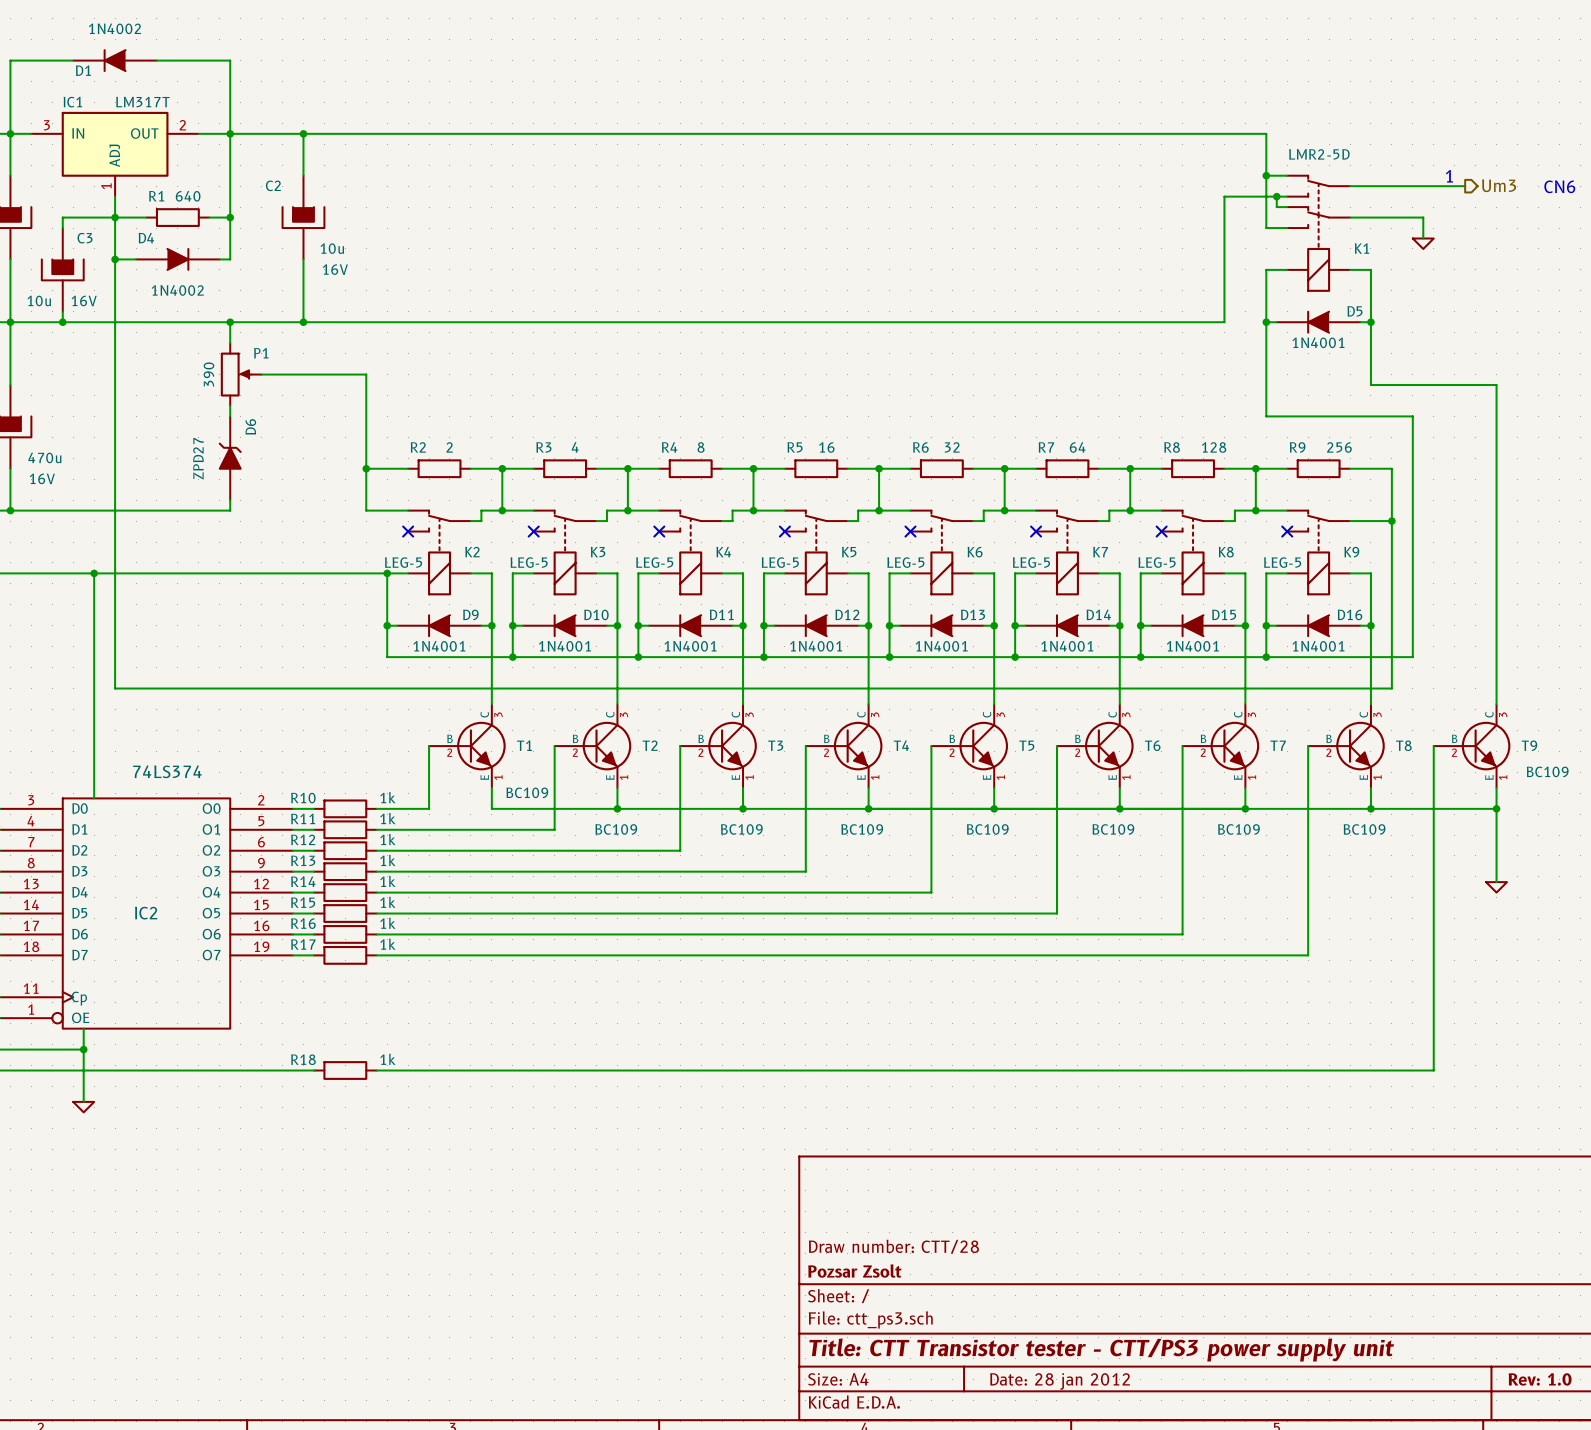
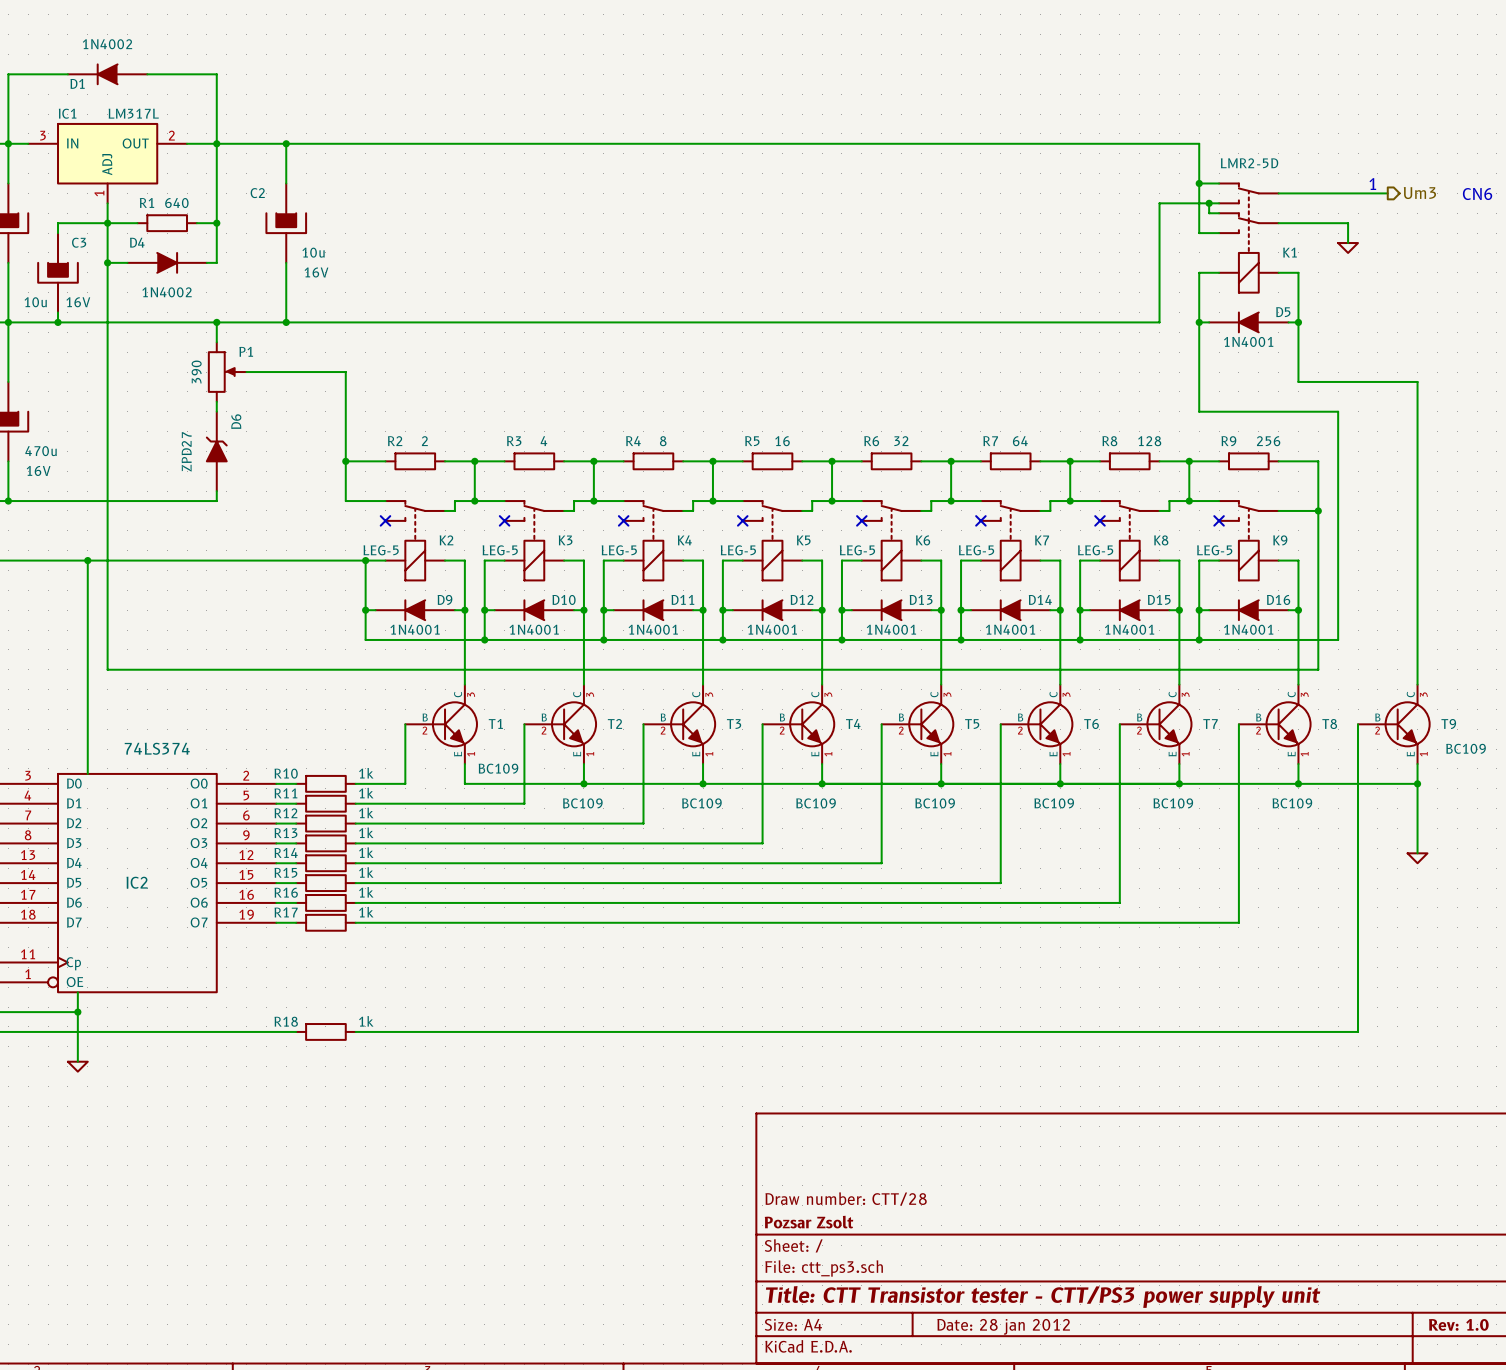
IC1 value: LM317T (142, 102) -> LM317L (133, 113)

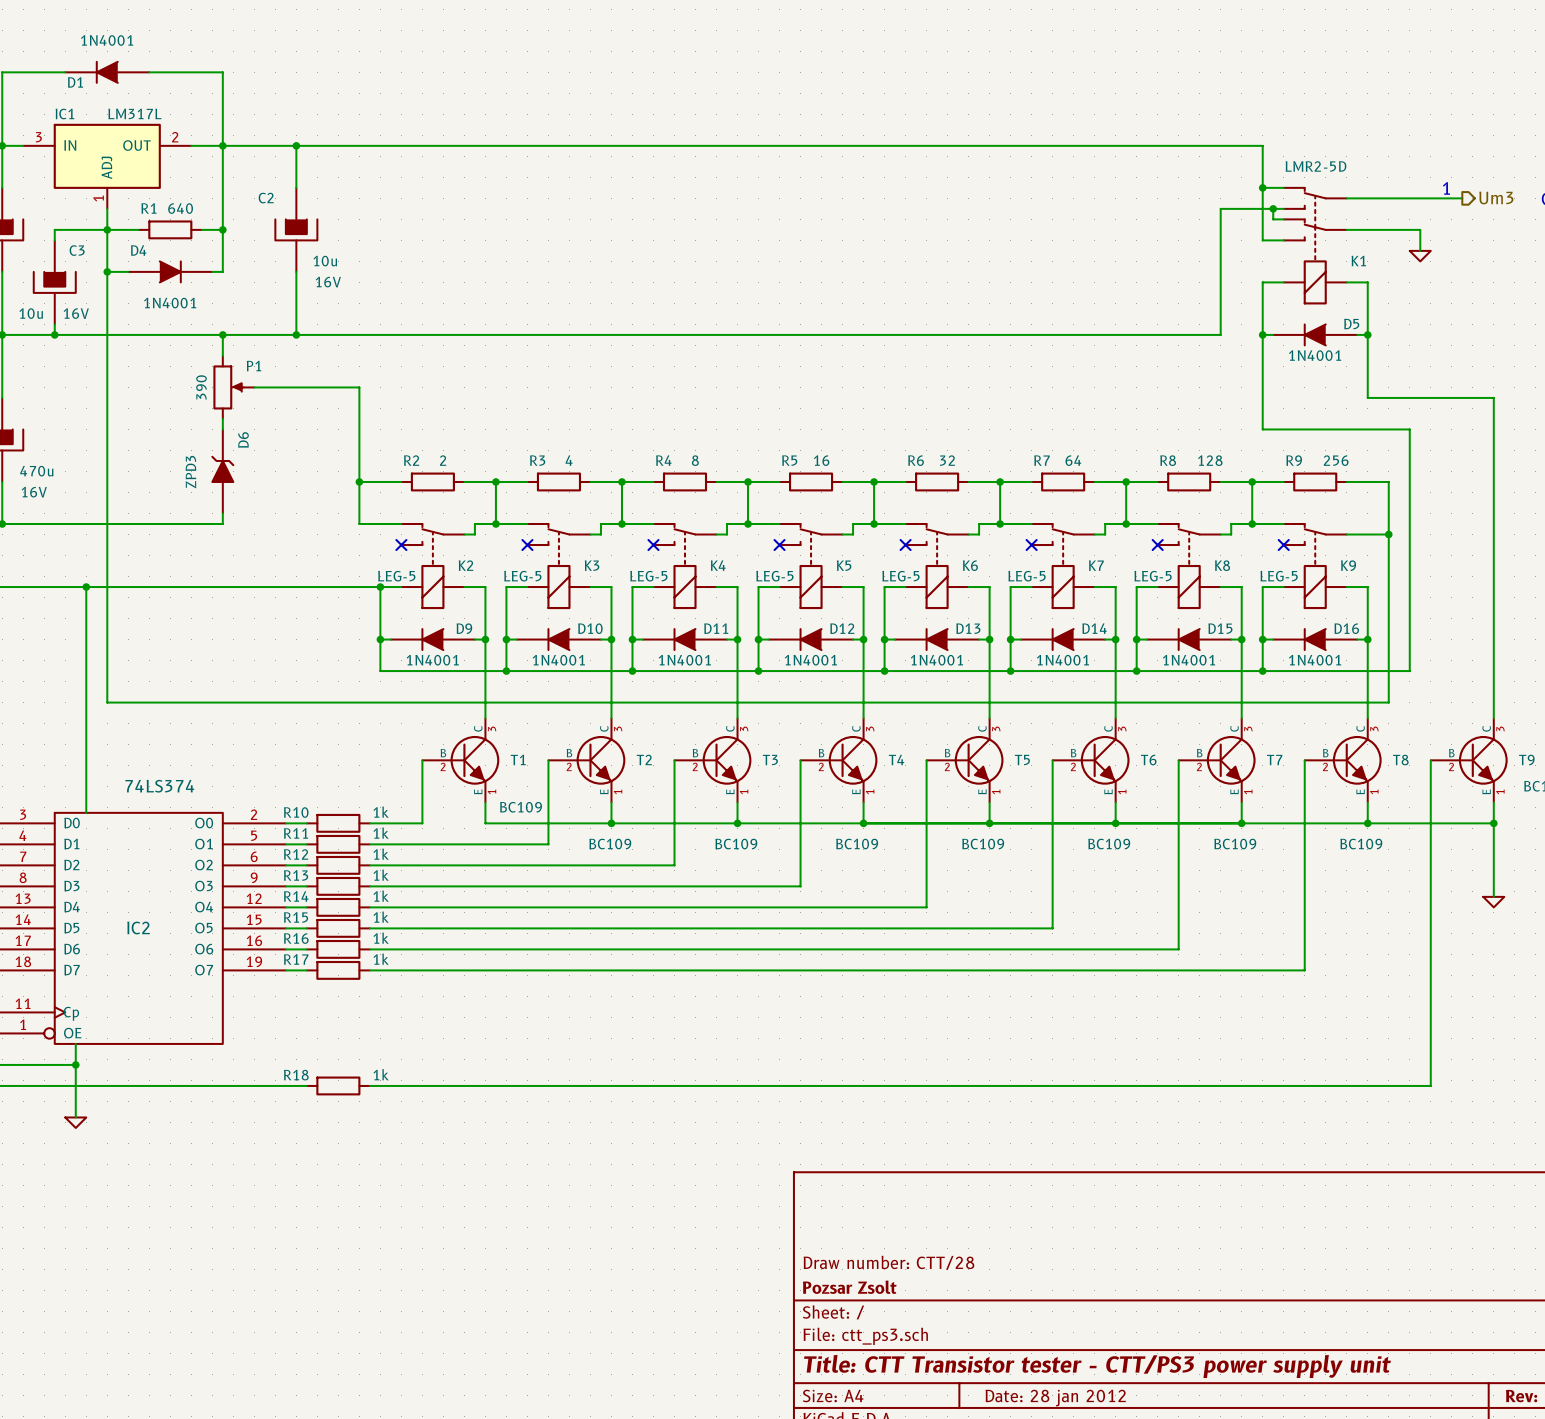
D1 value: 1N4002 (107, 44) -> 1N4001 (107, 40)
D4 value: 1N4002 (167, 292) -> 1N4001 (170, 303)
D6 value: ZPD27 (186, 451) -> ZPD3 (190, 472)

